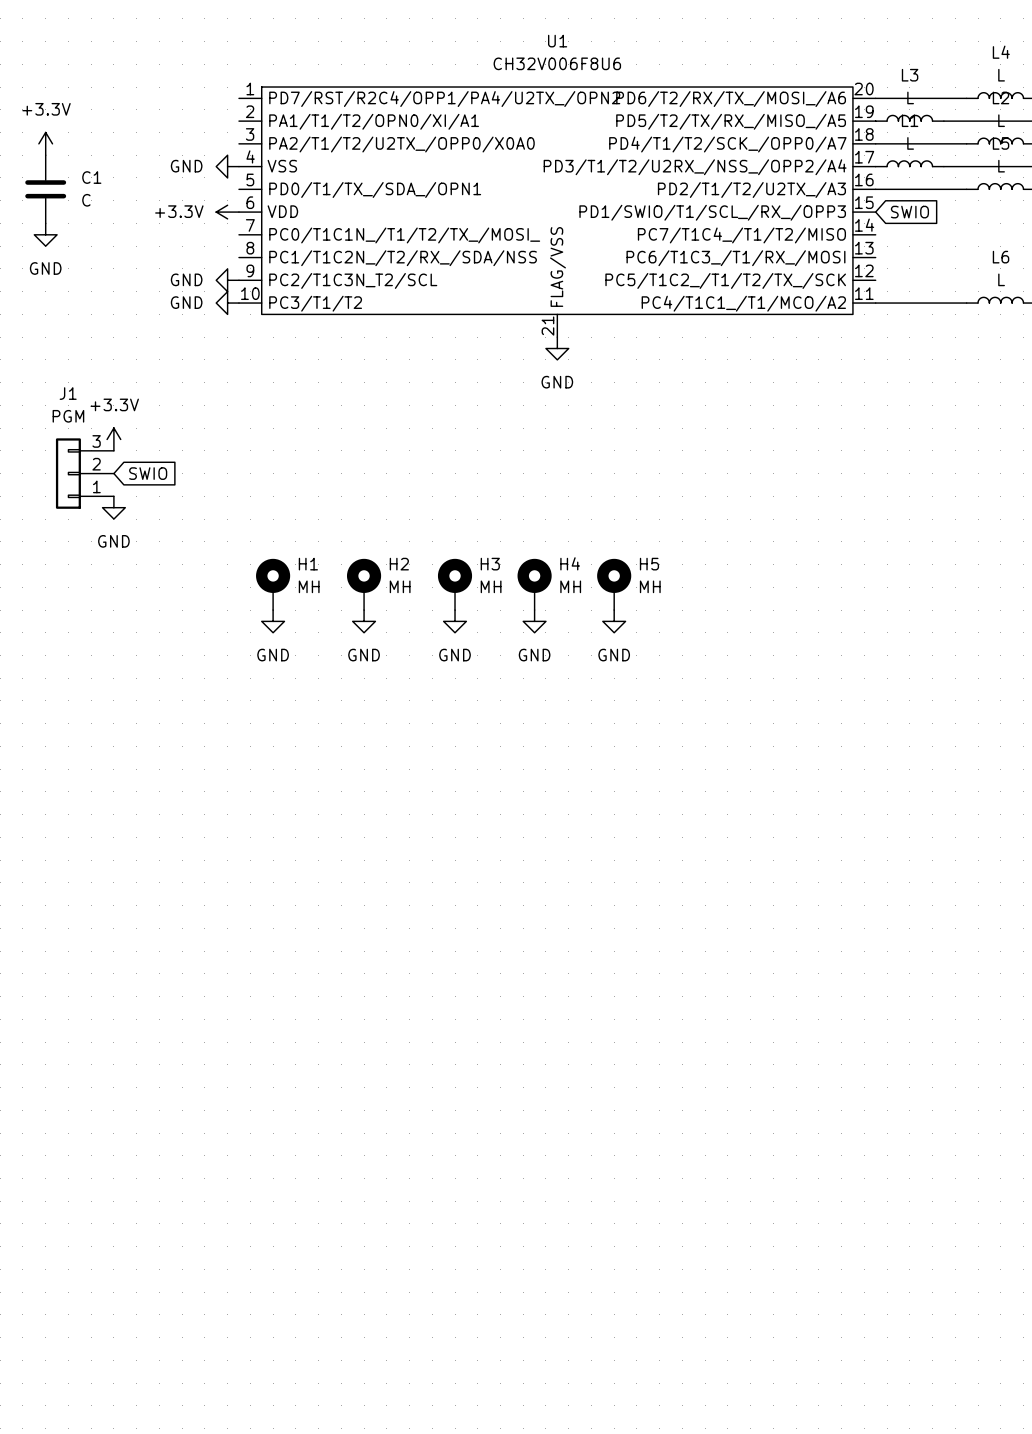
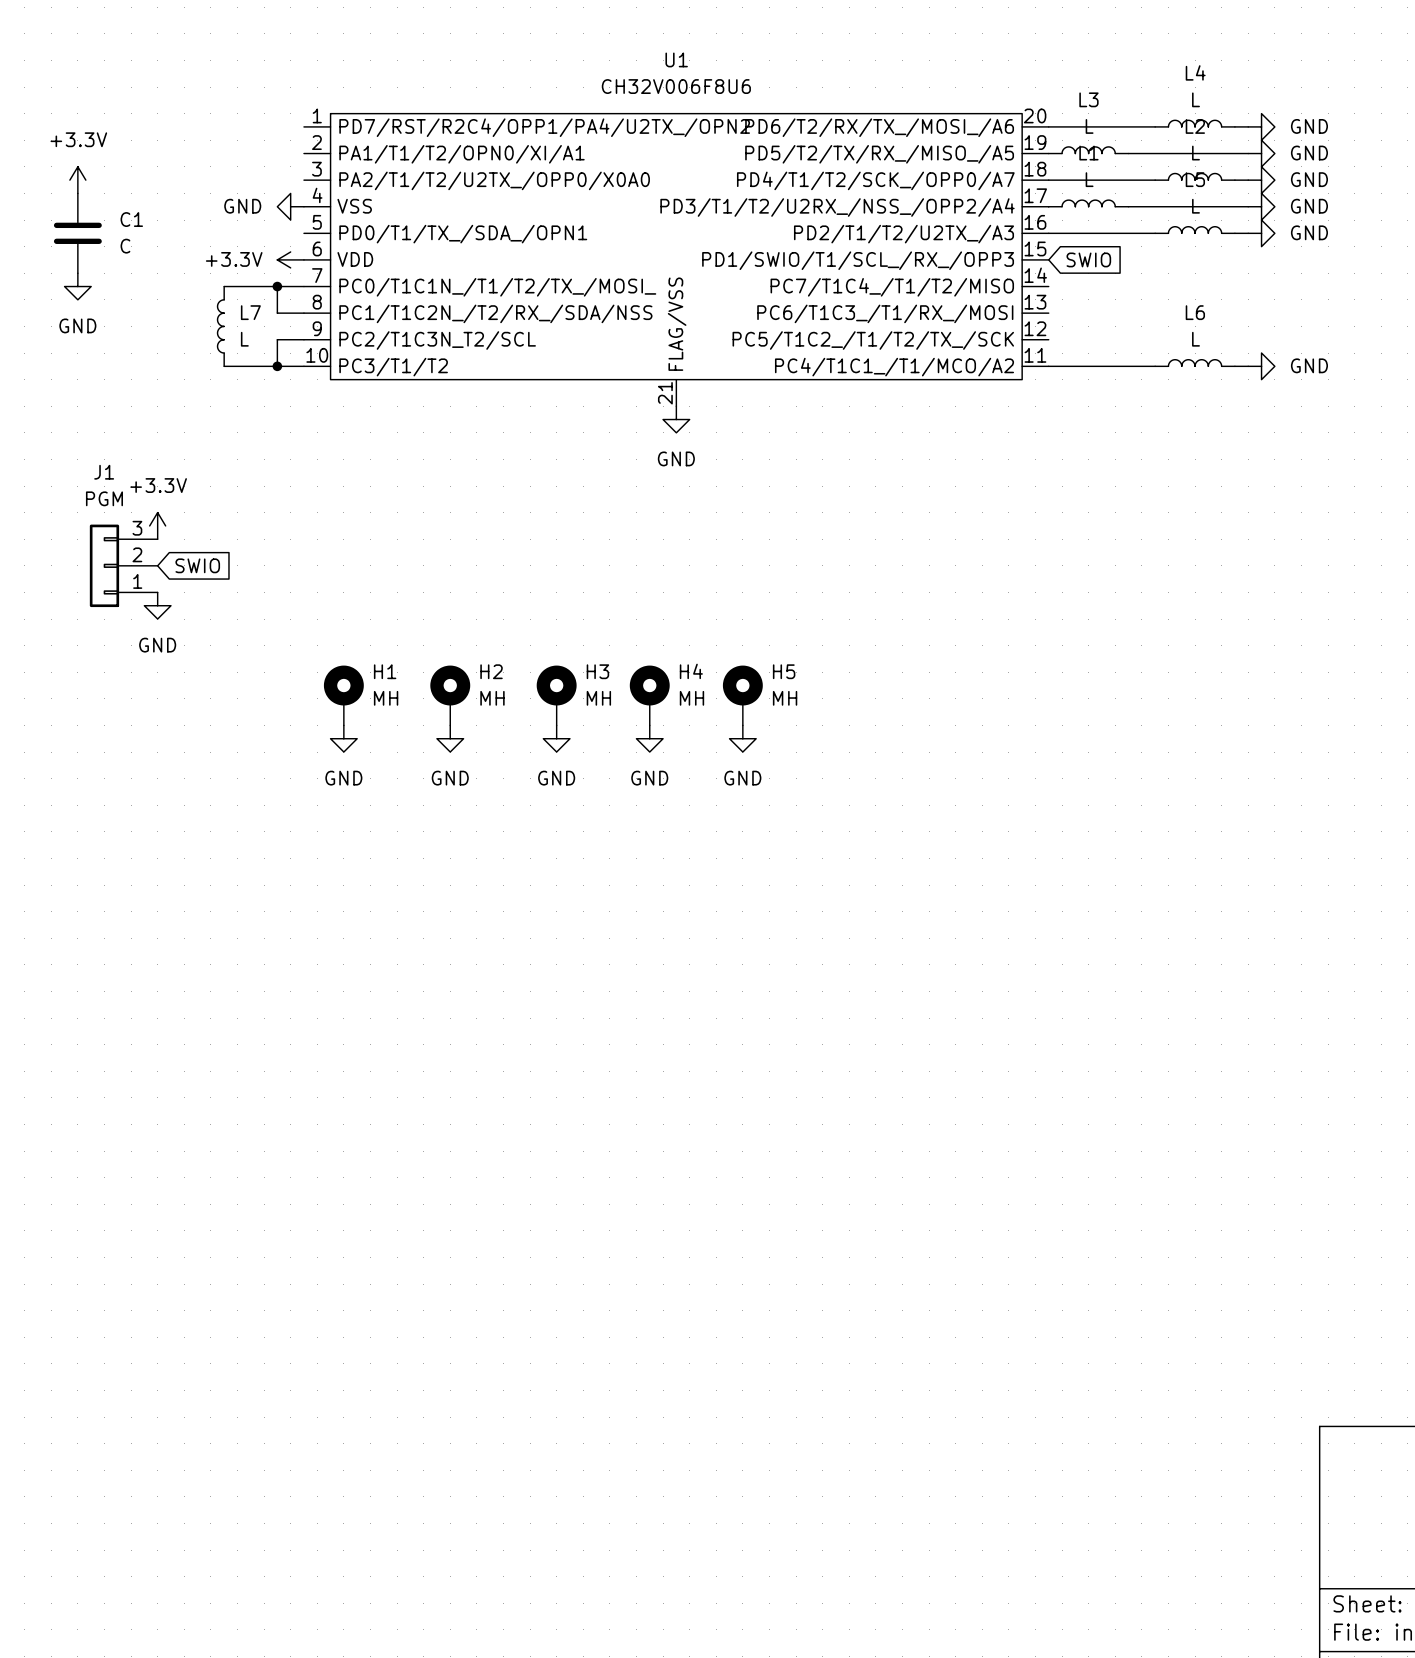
wire: none -> (224, 286) (303, 286)
wire: none -> (277, 286) (277, 313) (303, 313)
junction: none -> (277, 286)
L7: none -> L (220, 326)
power symbol: GND (227, 280) -> none
wire: none -> (303, 339) (277, 339) (277, 366)
wire: none -> (224, 366) (303, 366)
junction: none -> (277, 366)
power symbol: GND (227, 303) -> none

